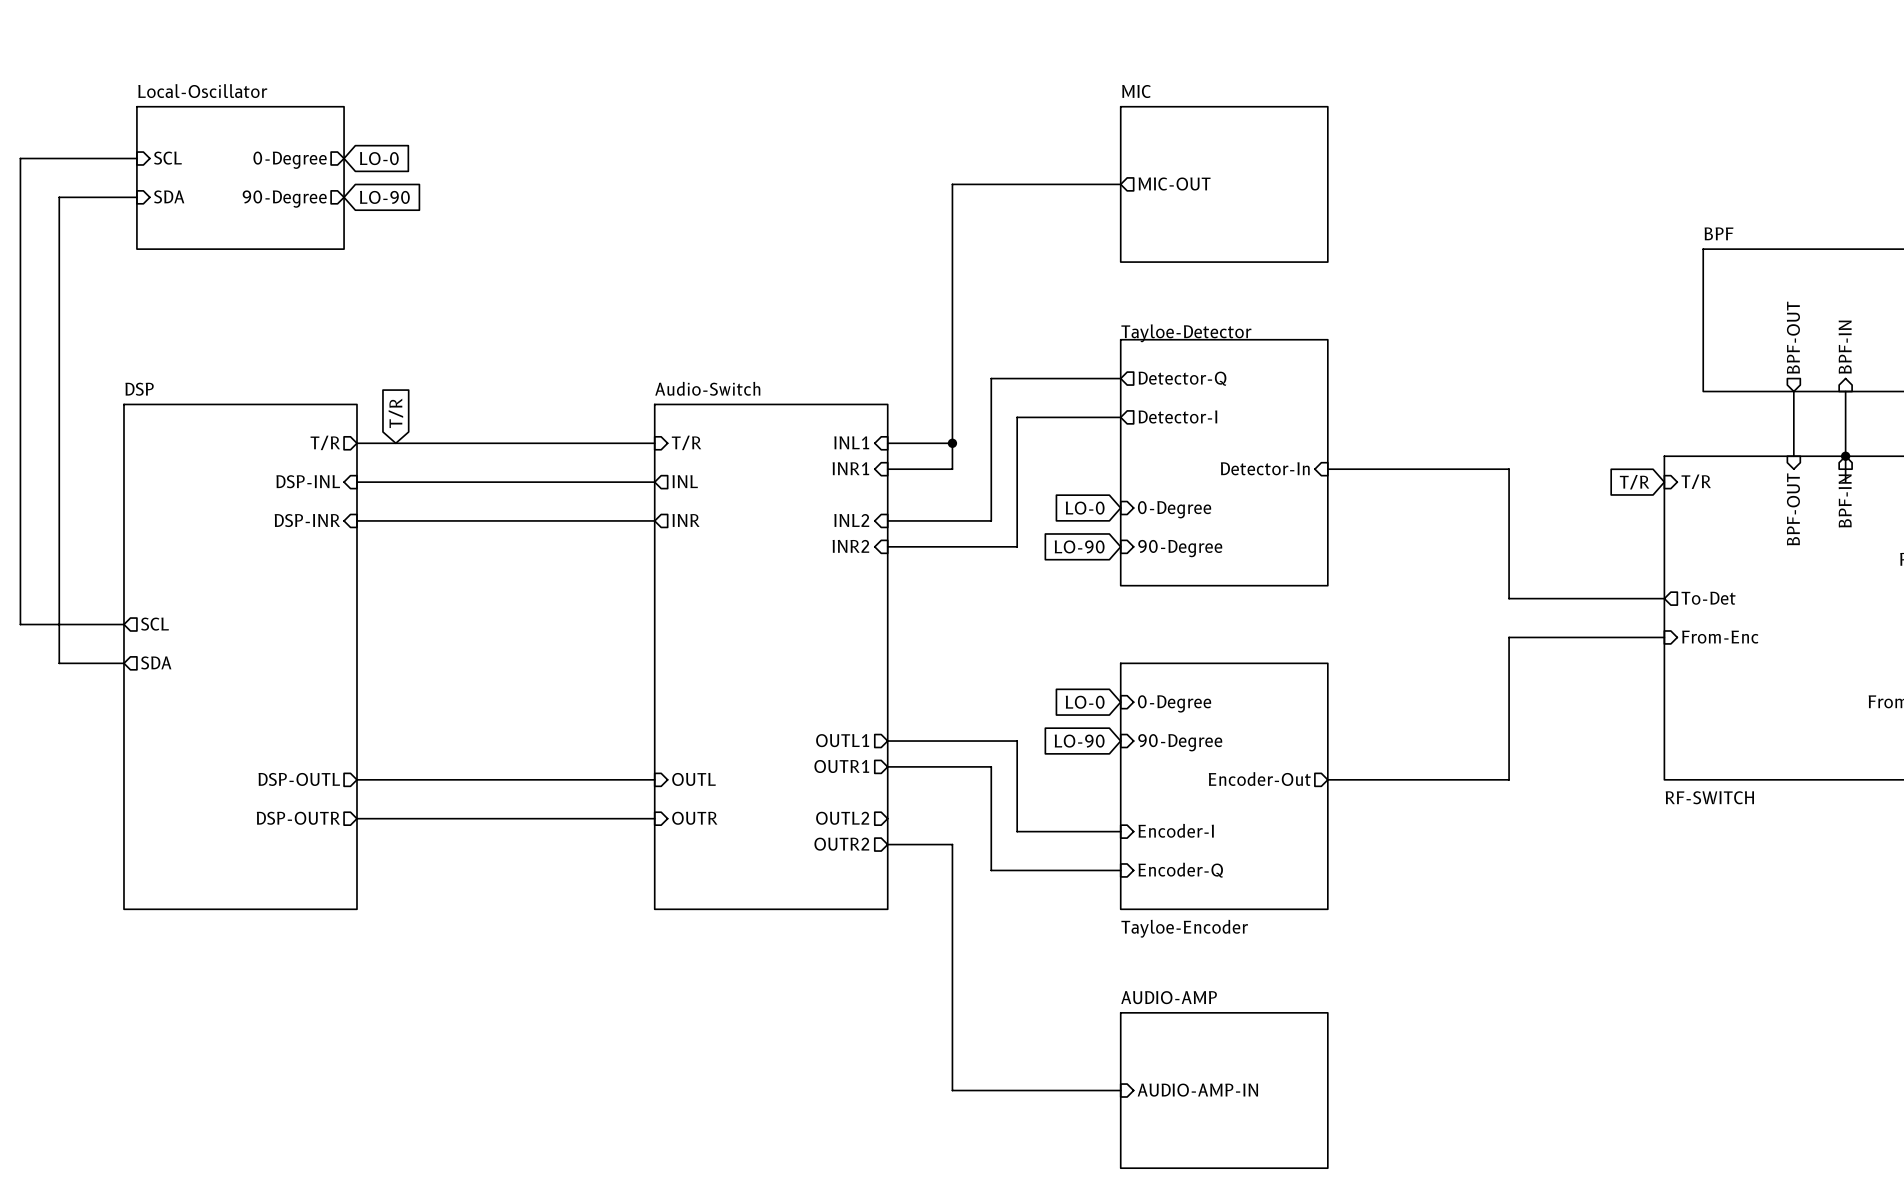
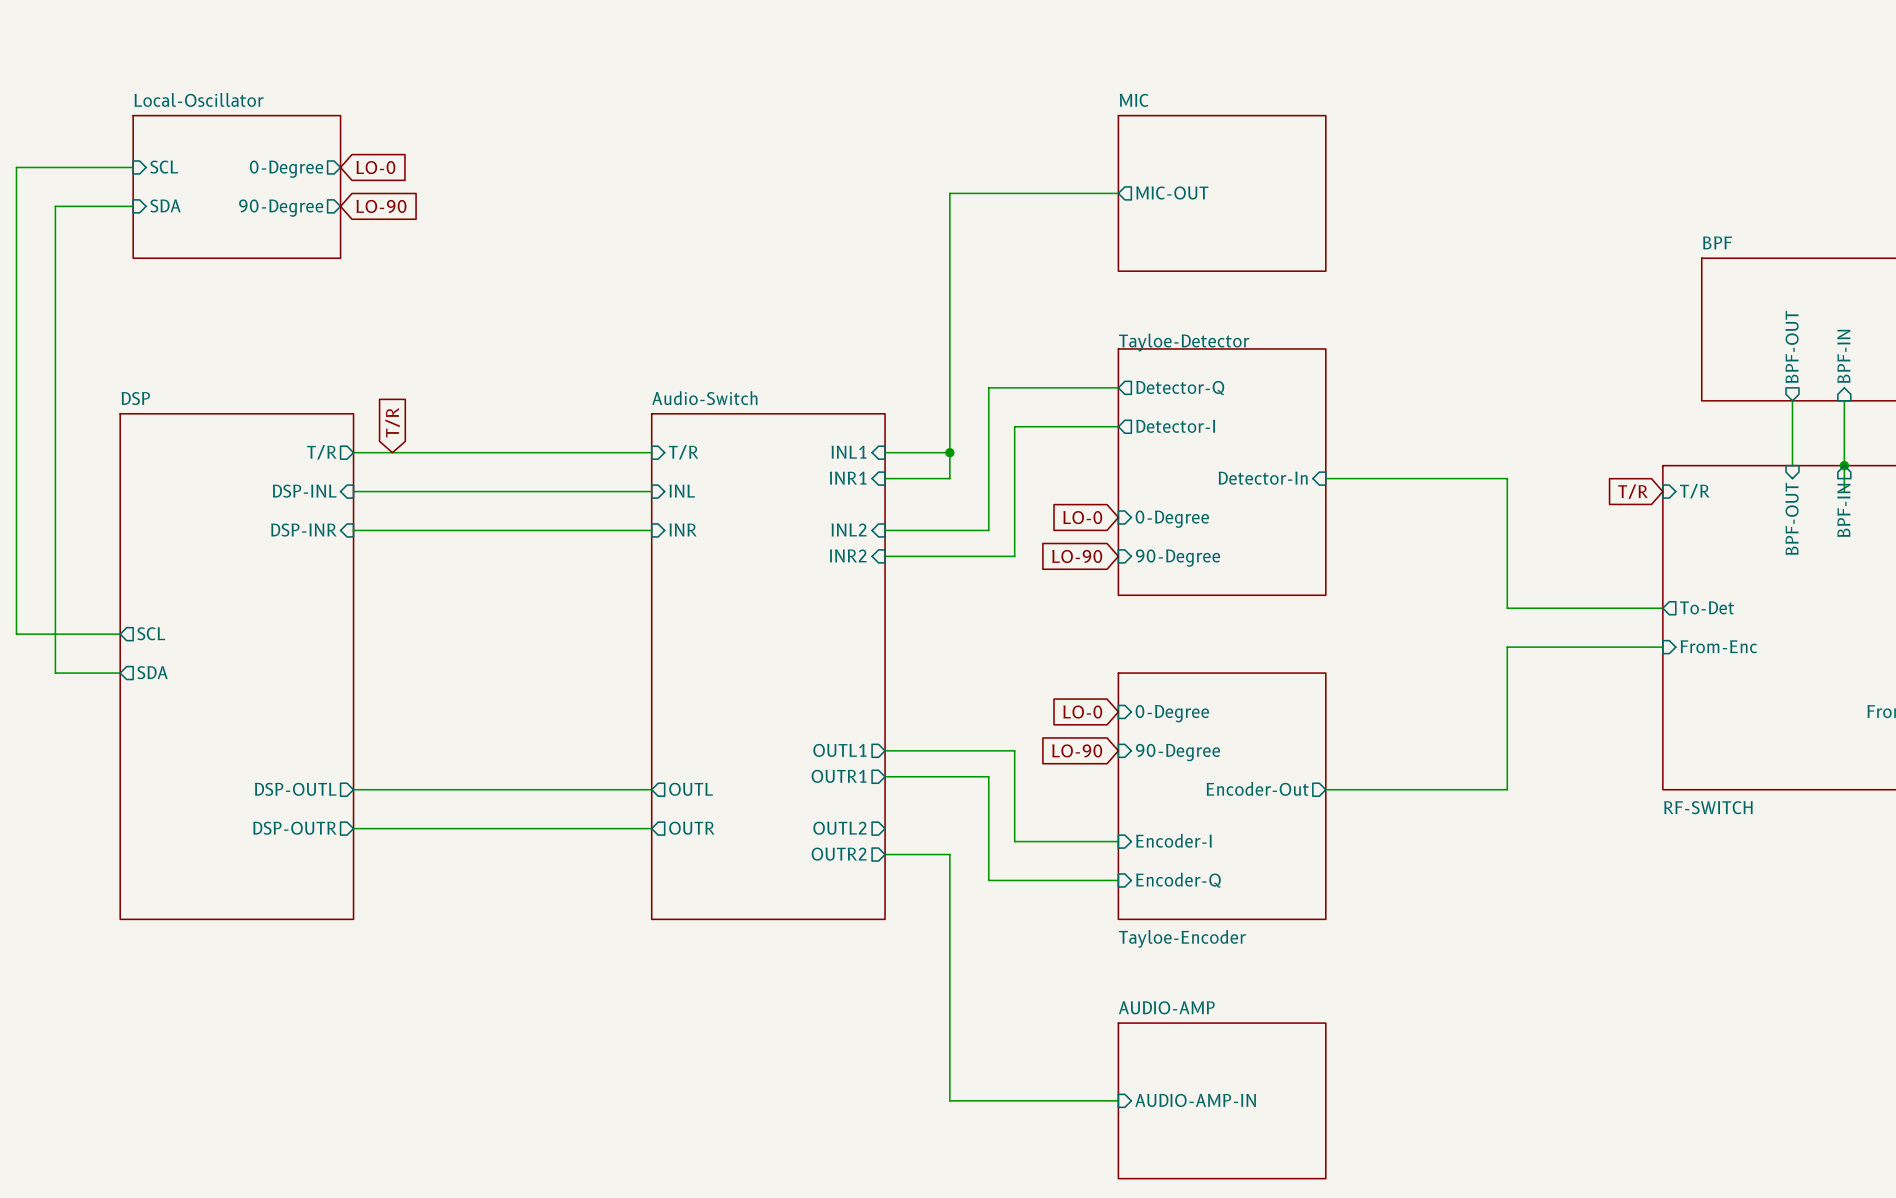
sheet pin shape: output (685, 481) -> input (682, 491)
sheet pin shape: output (686, 520) -> input (683, 529)
sheet pin shape: input (694, 779) -> output (691, 789)
sheet pin shape: input (694, 818) -> output (691, 828)

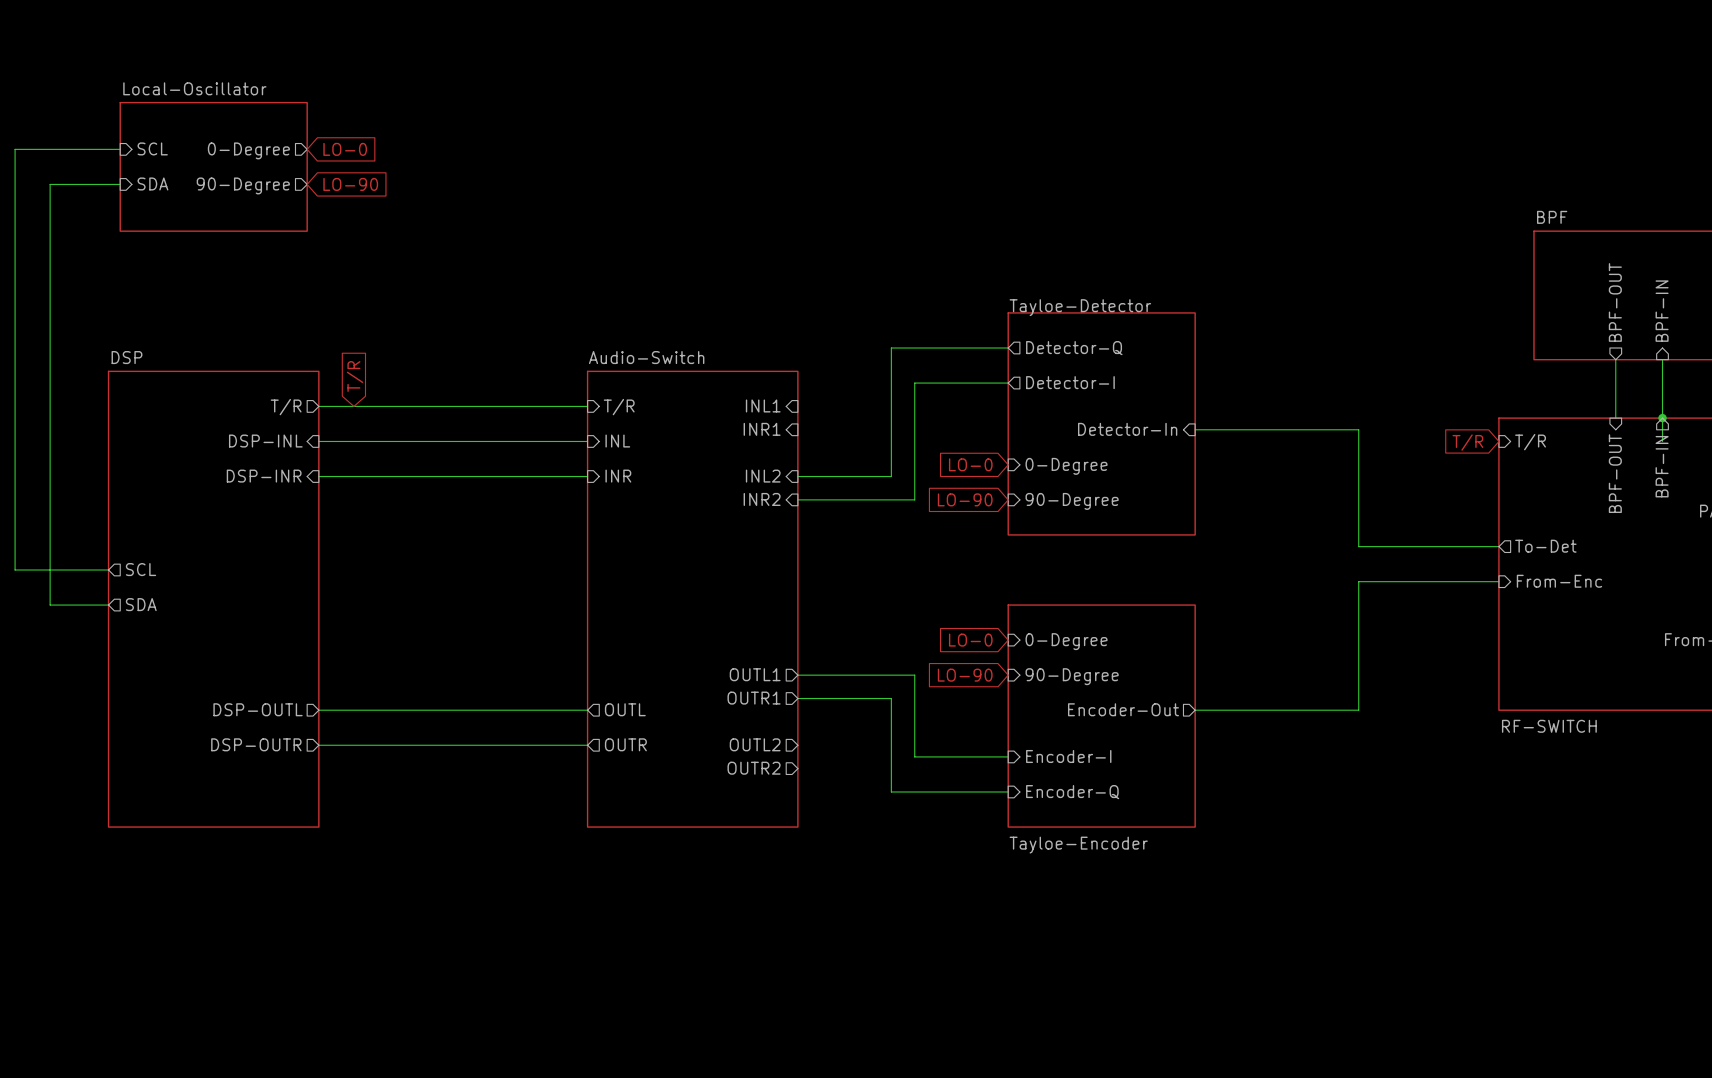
sheet pin: MIC-OUT (1172, 192) -> none
wire: (1118, 193) (949, 193) (949, 478) (885, 478) -> none
sheet MIC: (1222, 193) -> none
wire: (885, 452) (949, 452) -> none
junction: (949, 452) -> none
wire: (885, 854) (949, 854) (949, 1100) (1118, 1100) -> none
sheet pin: AUDIO-AMP-IN (1195, 1100) -> none
sheet AUDIO-AMP: (1222, 1100) -> none

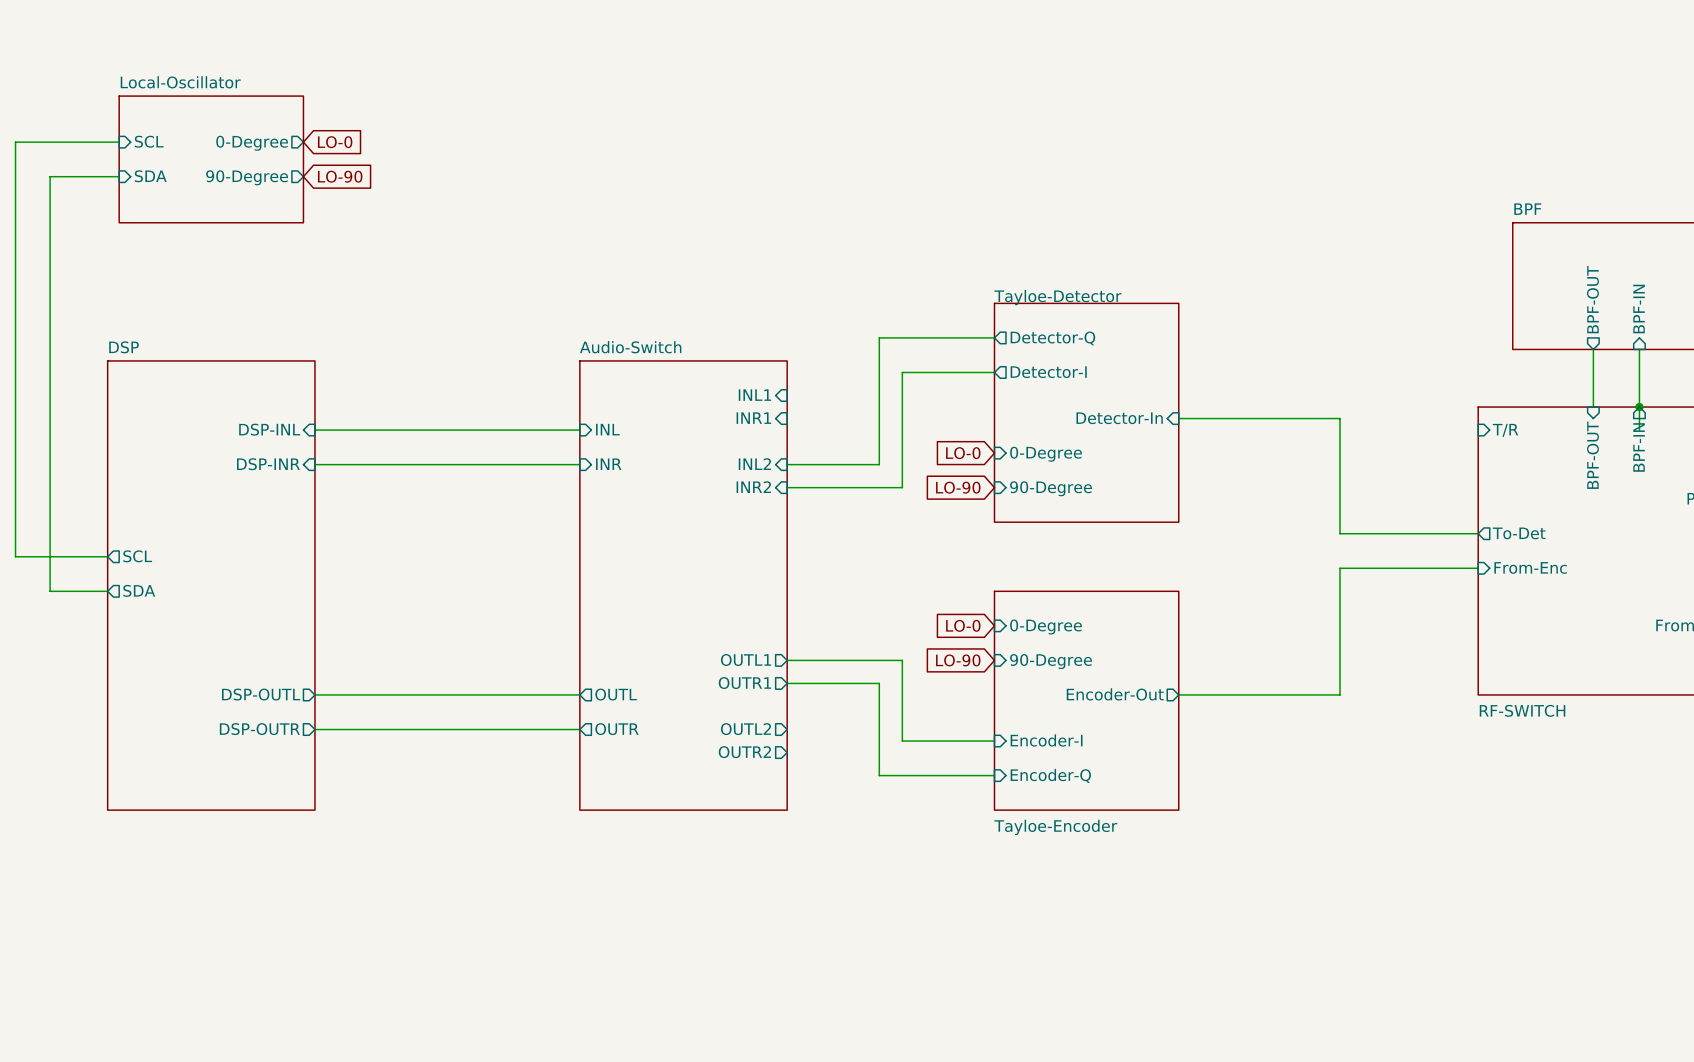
global label: T/R (355, 376) -> none
wire: (318, 406) (587, 406) -> none
sheet pin: T/R (286, 407) -> none
sheet pin: T/R (619, 407) -> none
global label: T/R (1467, 442) -> none

